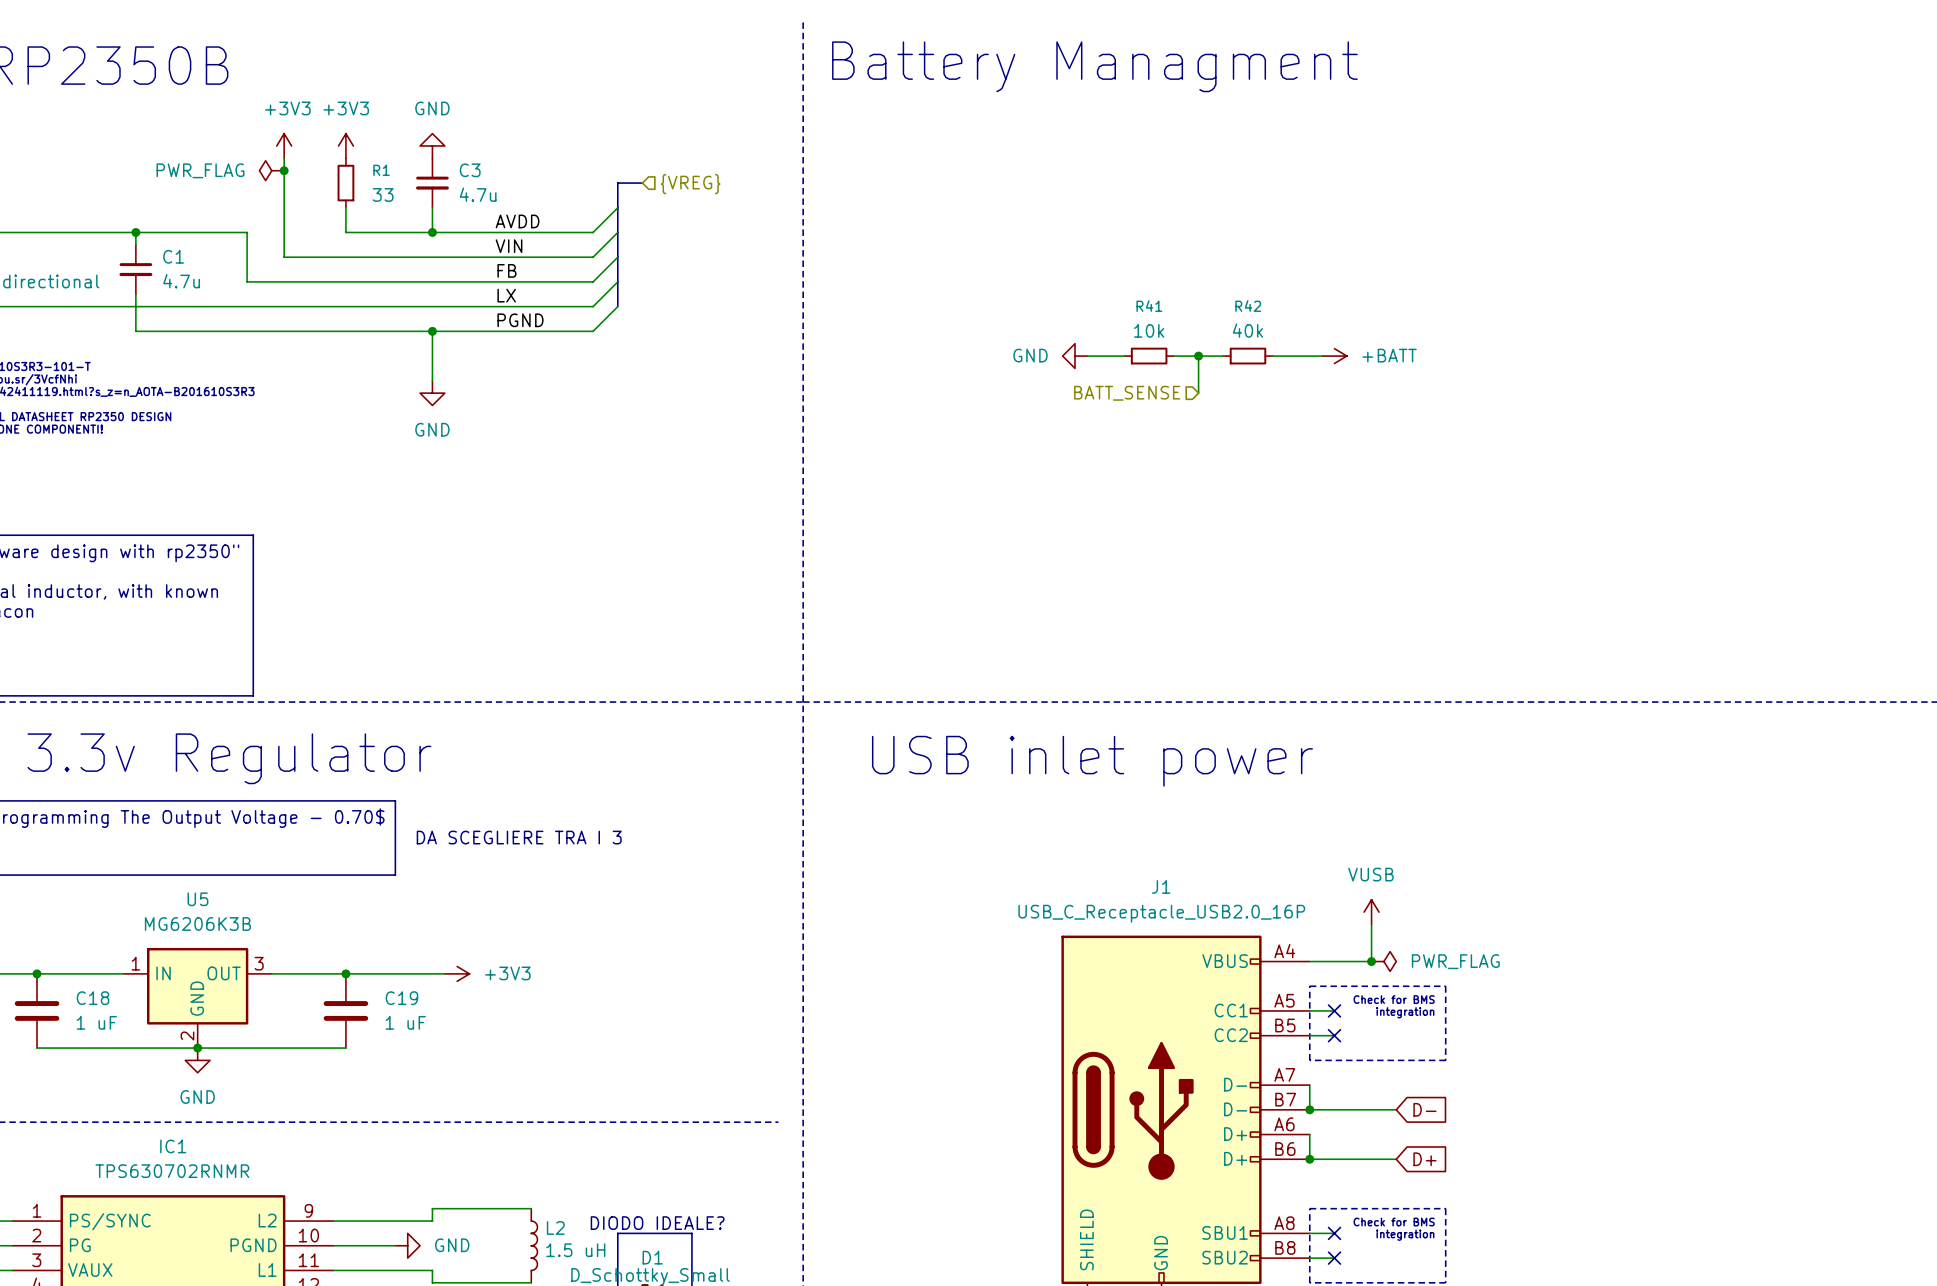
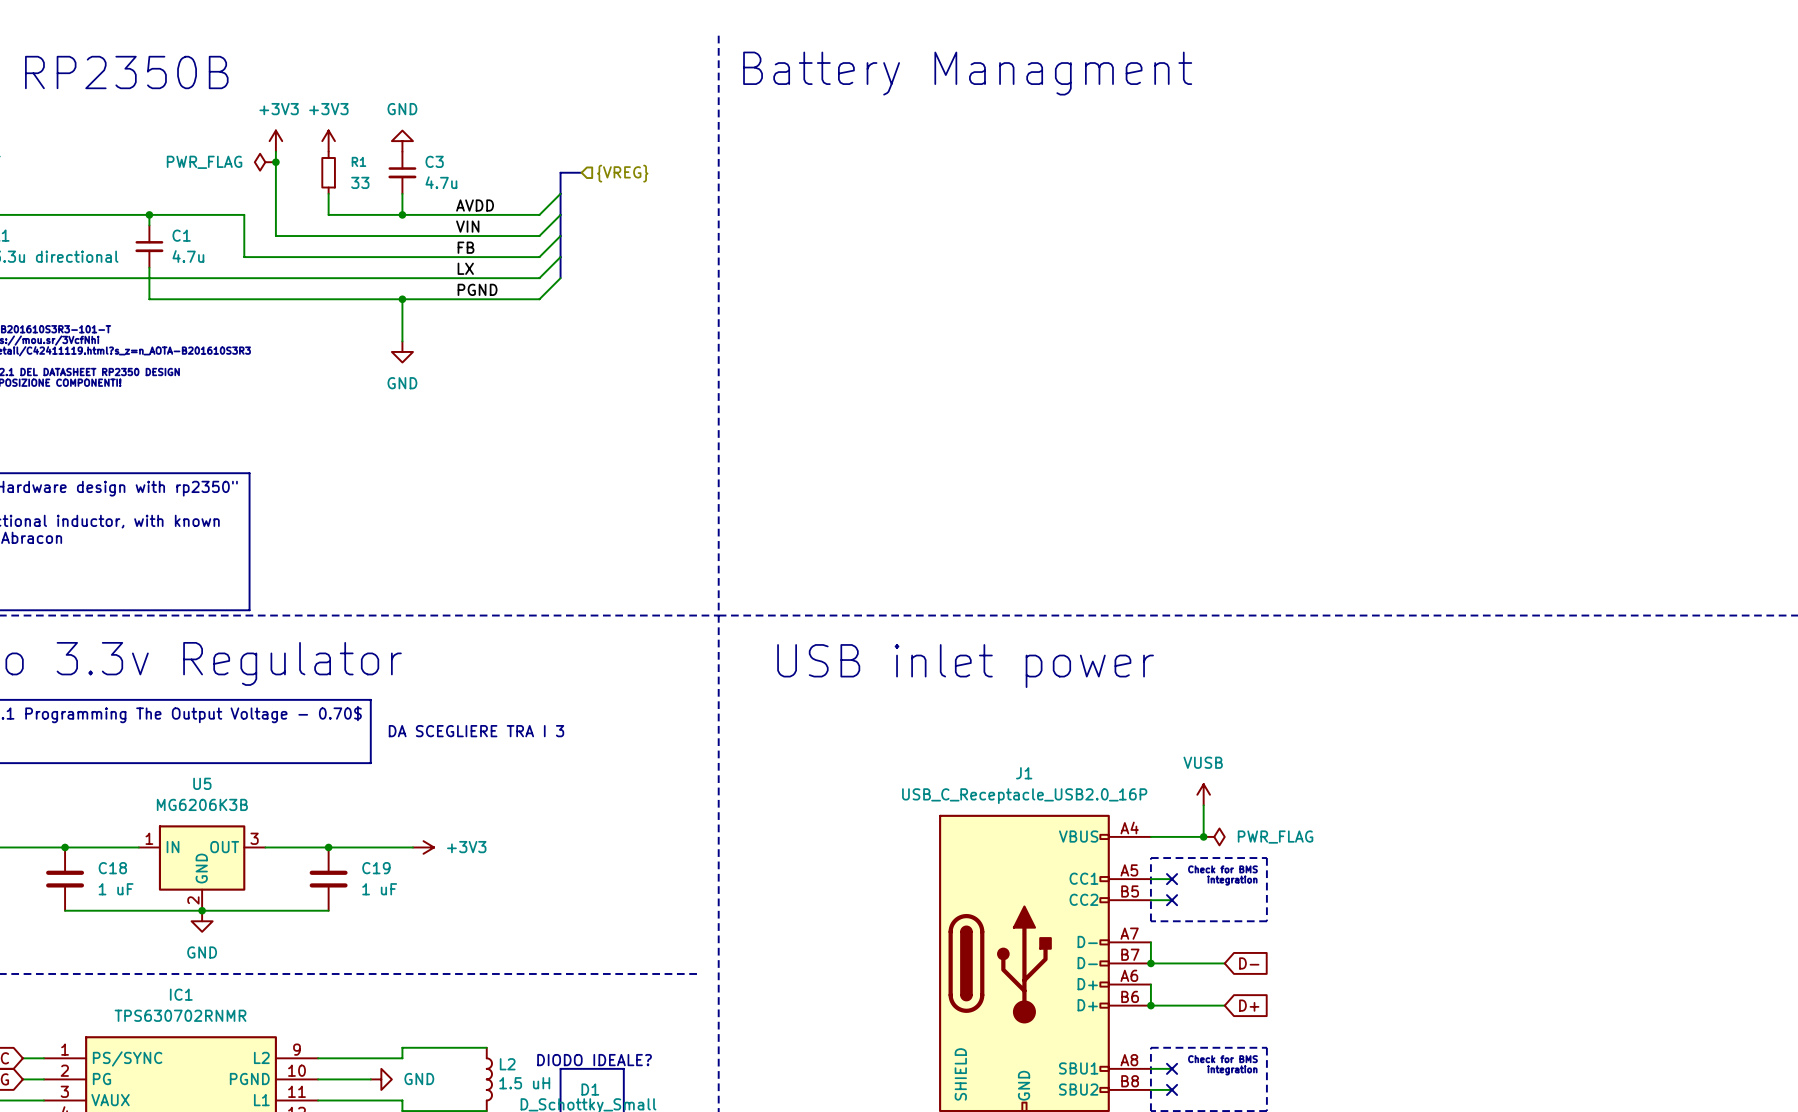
power symbol: GND (1075, 356) -> none
wire: (1087, 356) (1124, 356) -> none
R41: 10k (1149, 356) -> none
wire: (1173, 356) (1223, 356) -> none
wire: (1198, 356) (1198, 393) -> none
junction: (1198, 356) -> none
R42: 40k (1247, 356) -> none
wire: (1272, 356) (1322, 356) -> none
power symbol: +BATT (1334, 356) -> none
hierarchical label: BATT_SENSE (1127, 393) -> none

